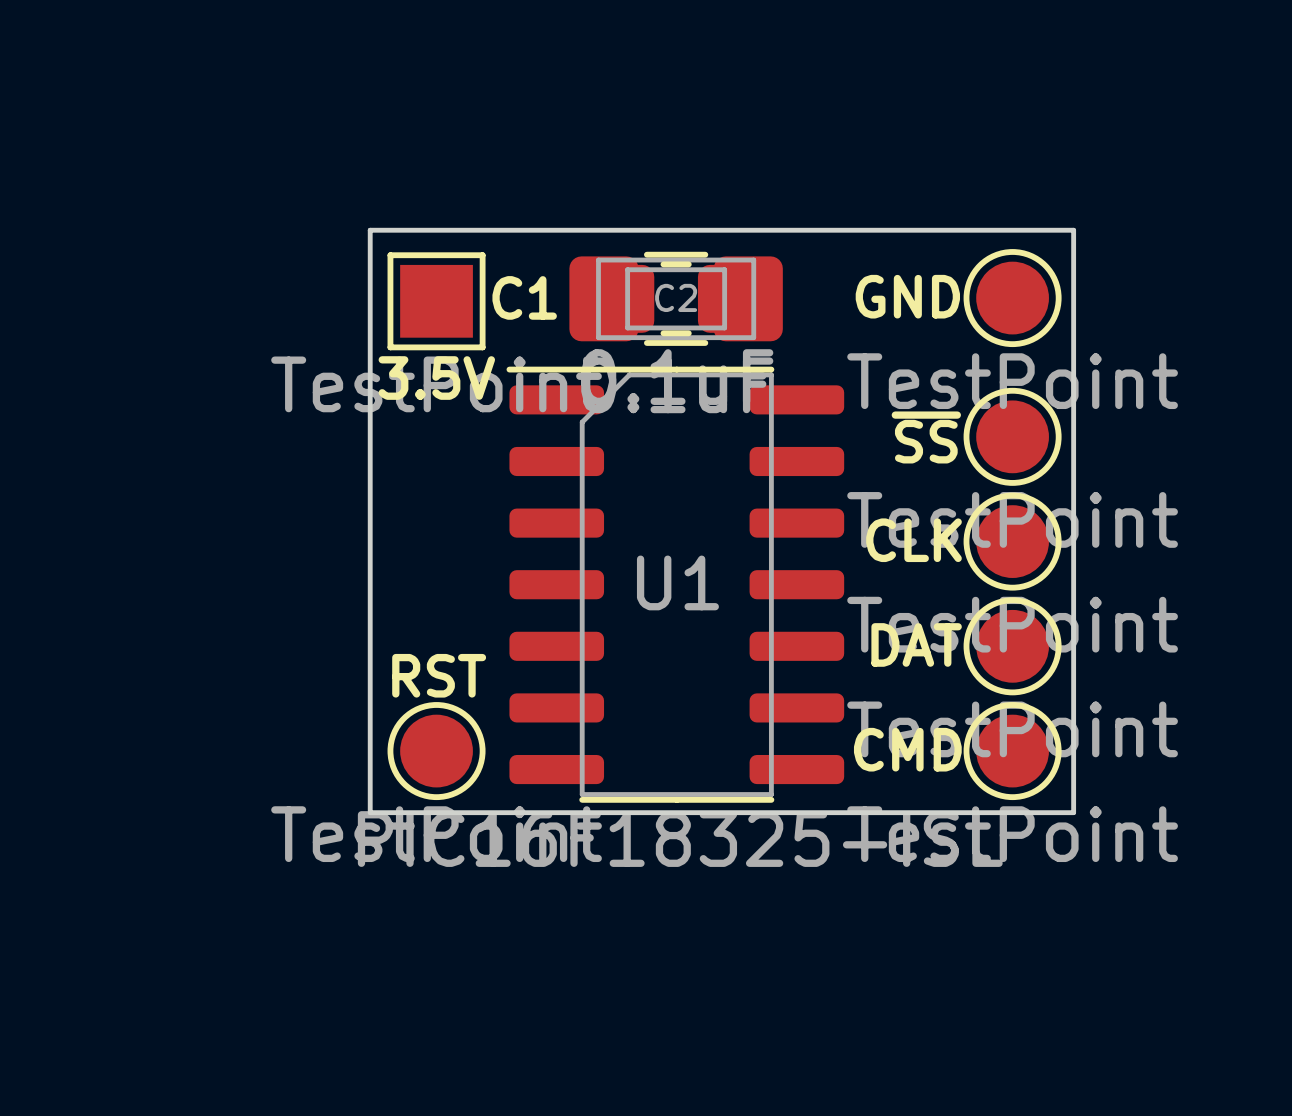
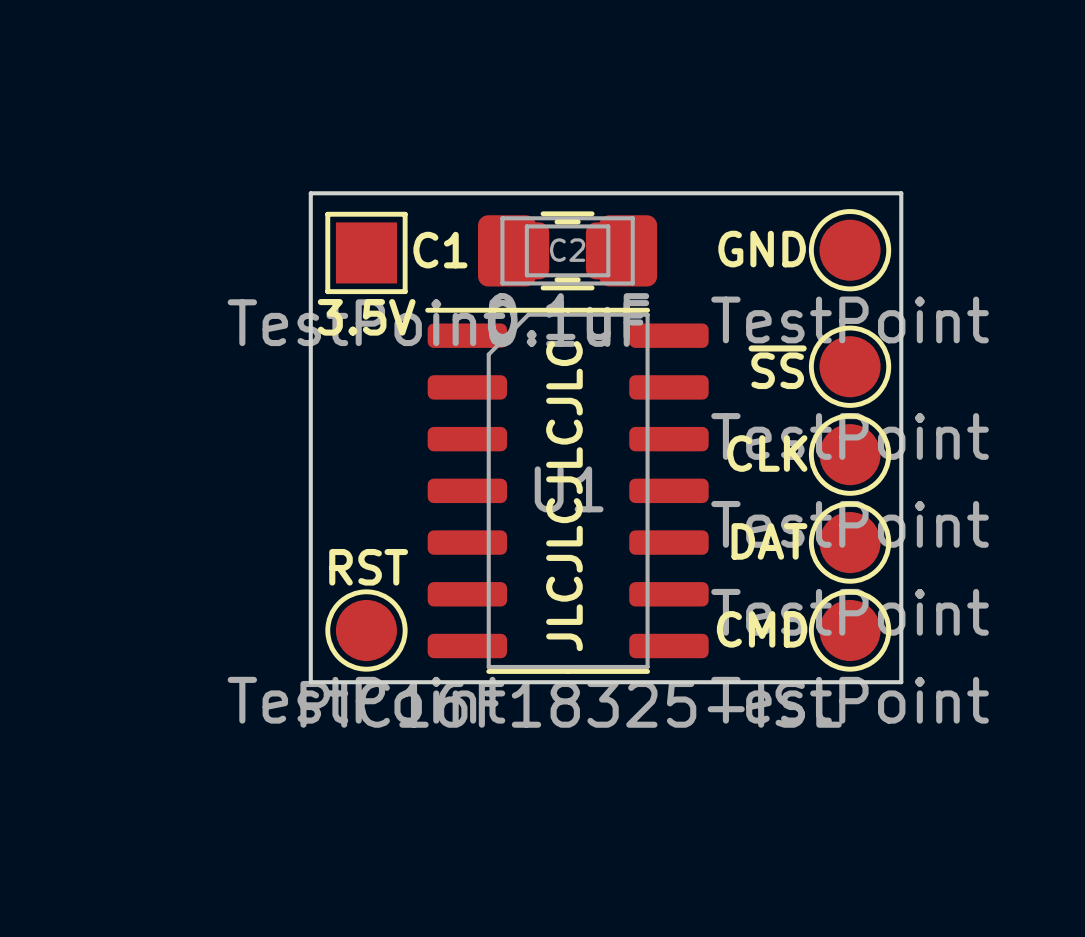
text: none -> JLCJLCJLCJLC (564, 496)

